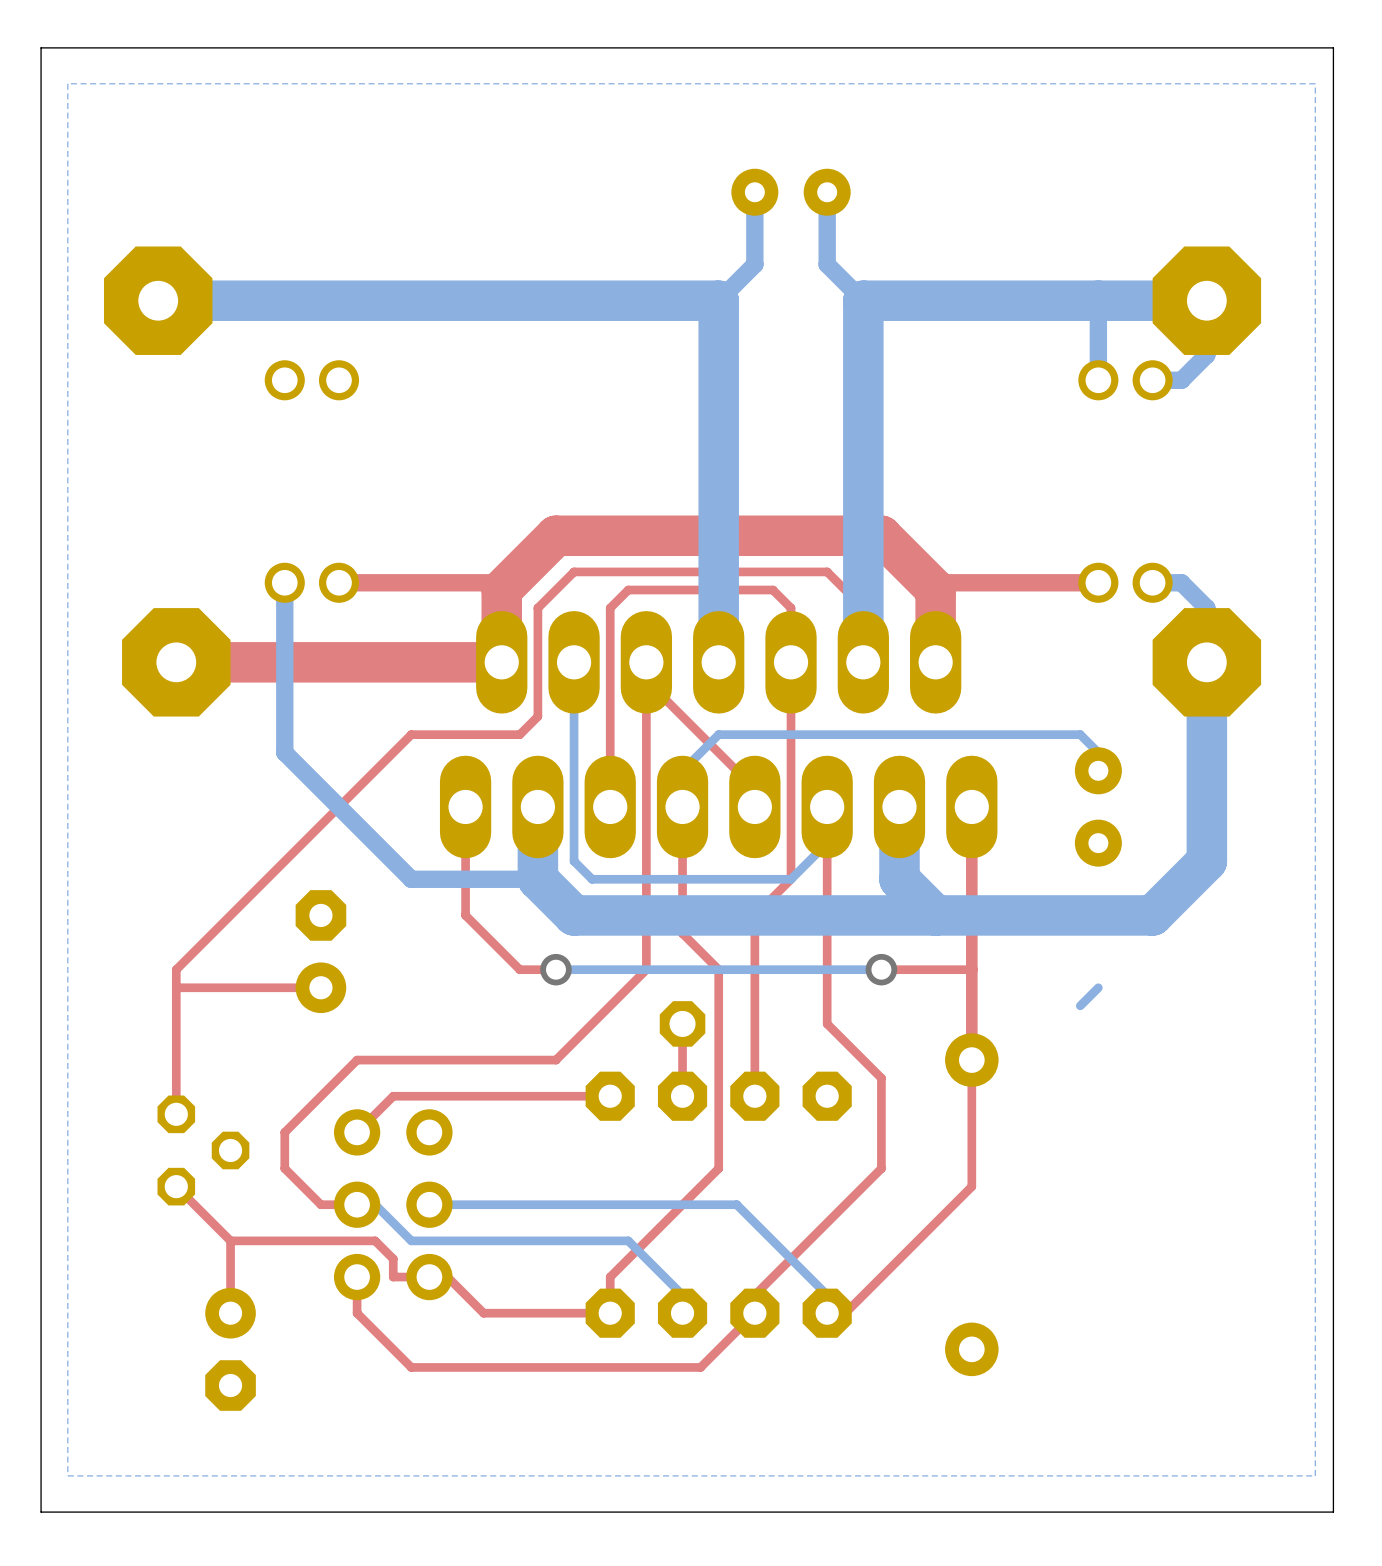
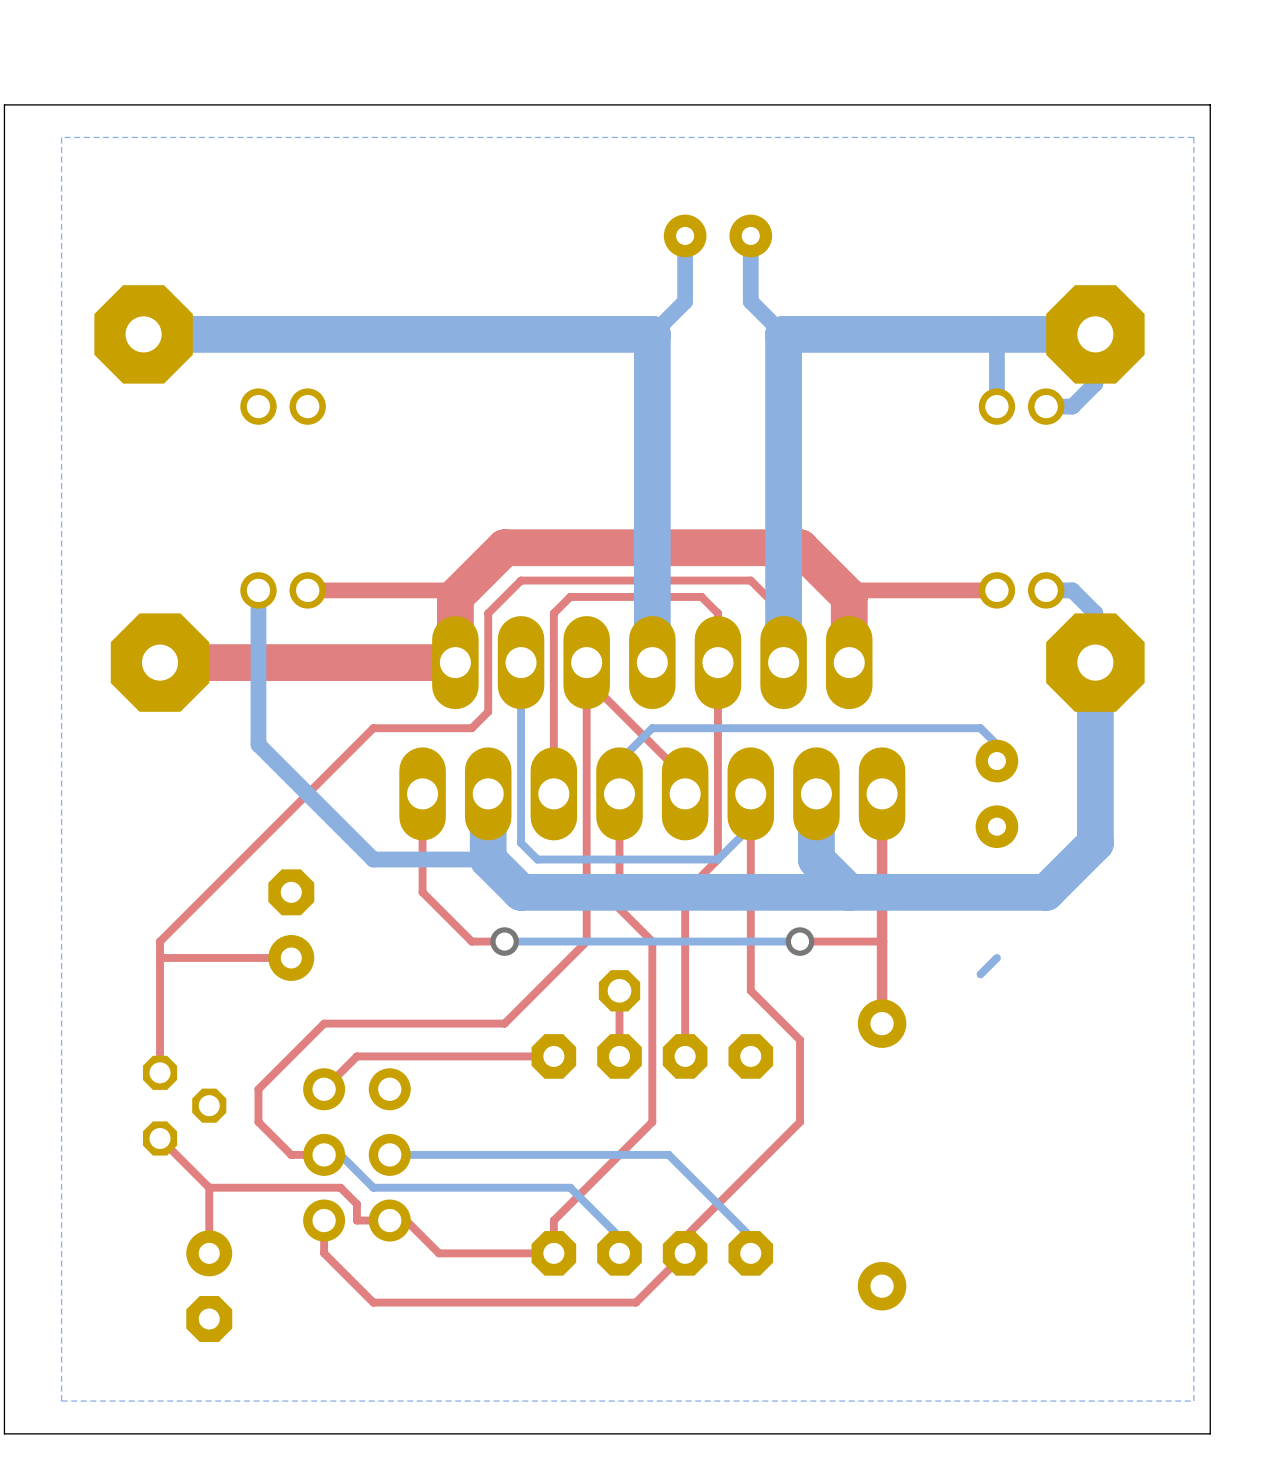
board edge: (41, 47) (41, 1512) -> (37, 104) (4, 104) (4, 1433) (37, 1433)
top track: (971, 1060) (971, 1186) (845, 1313) (827, 1313) -> none

